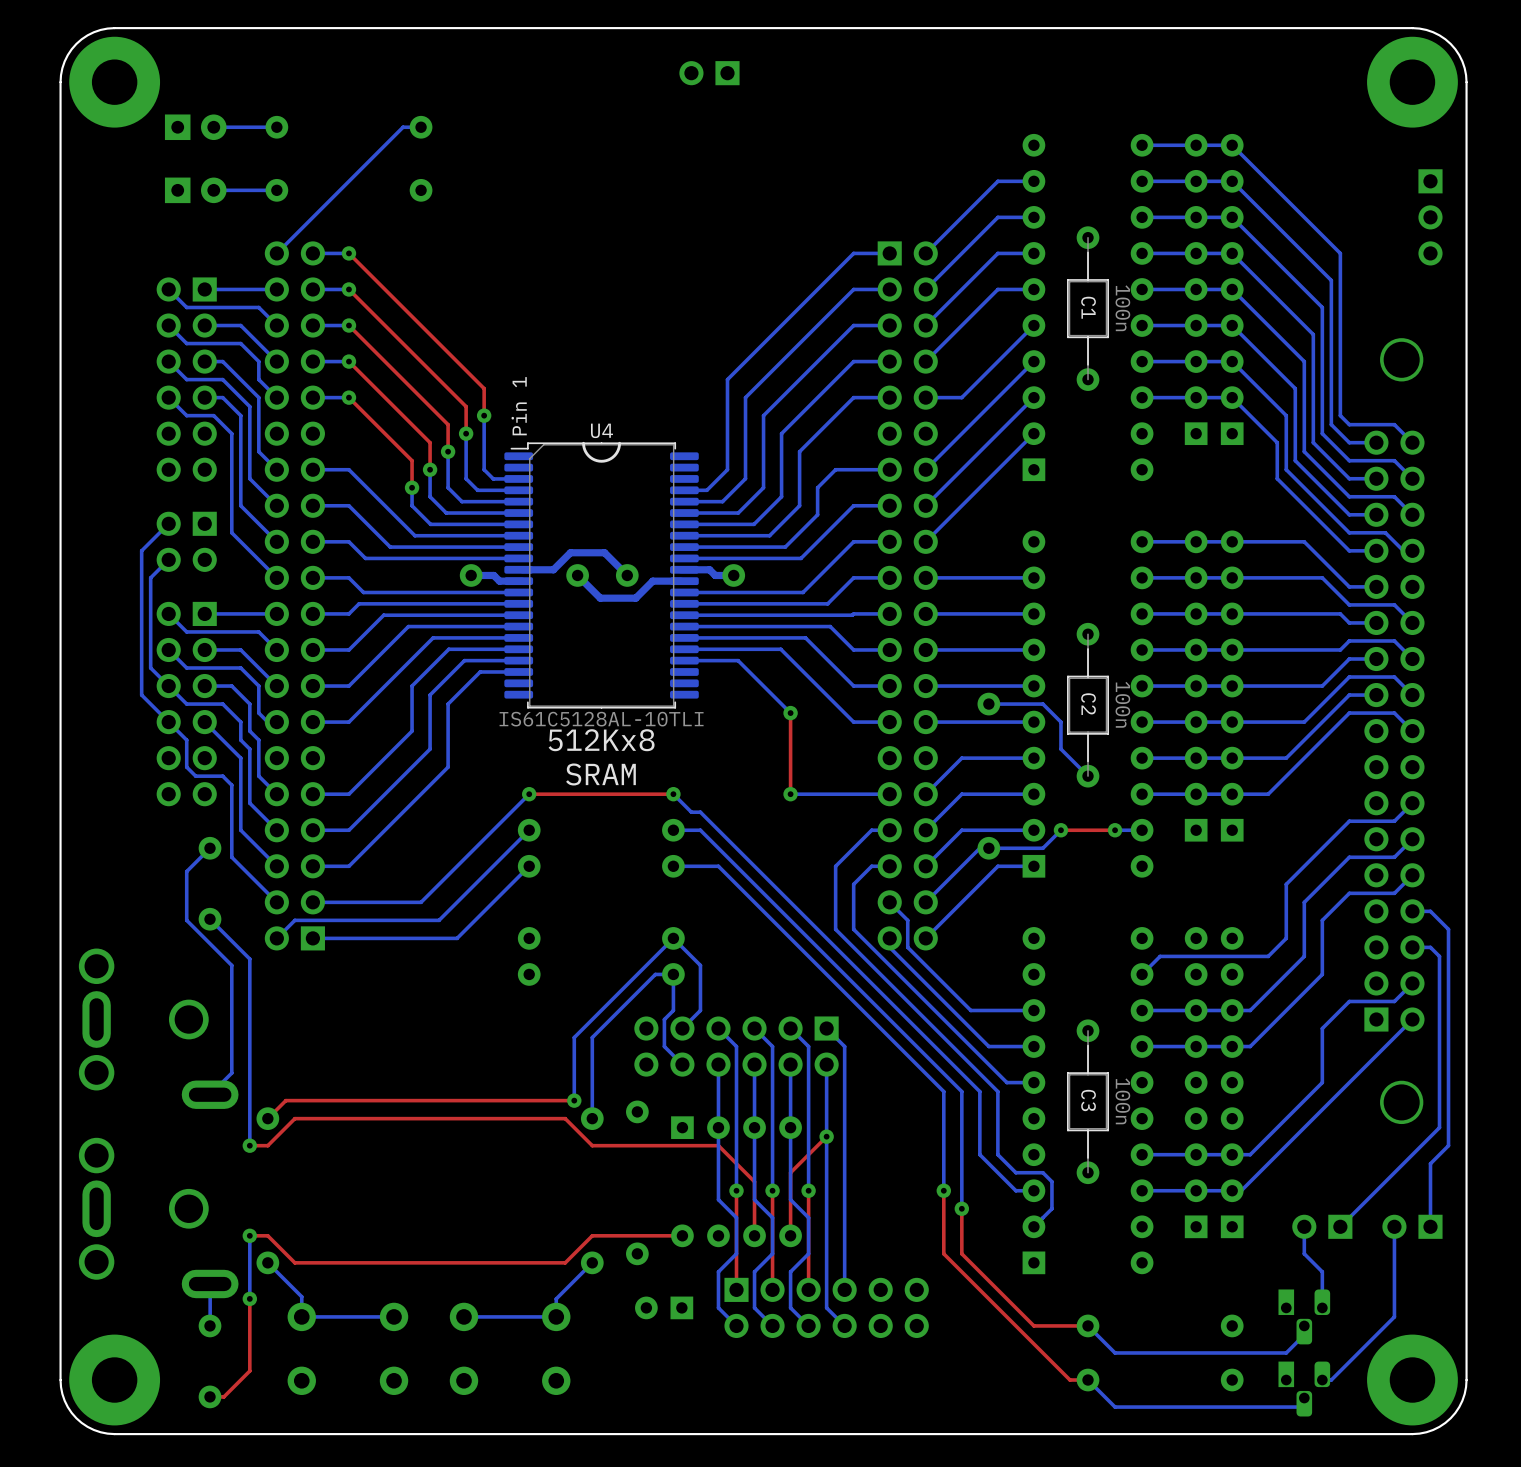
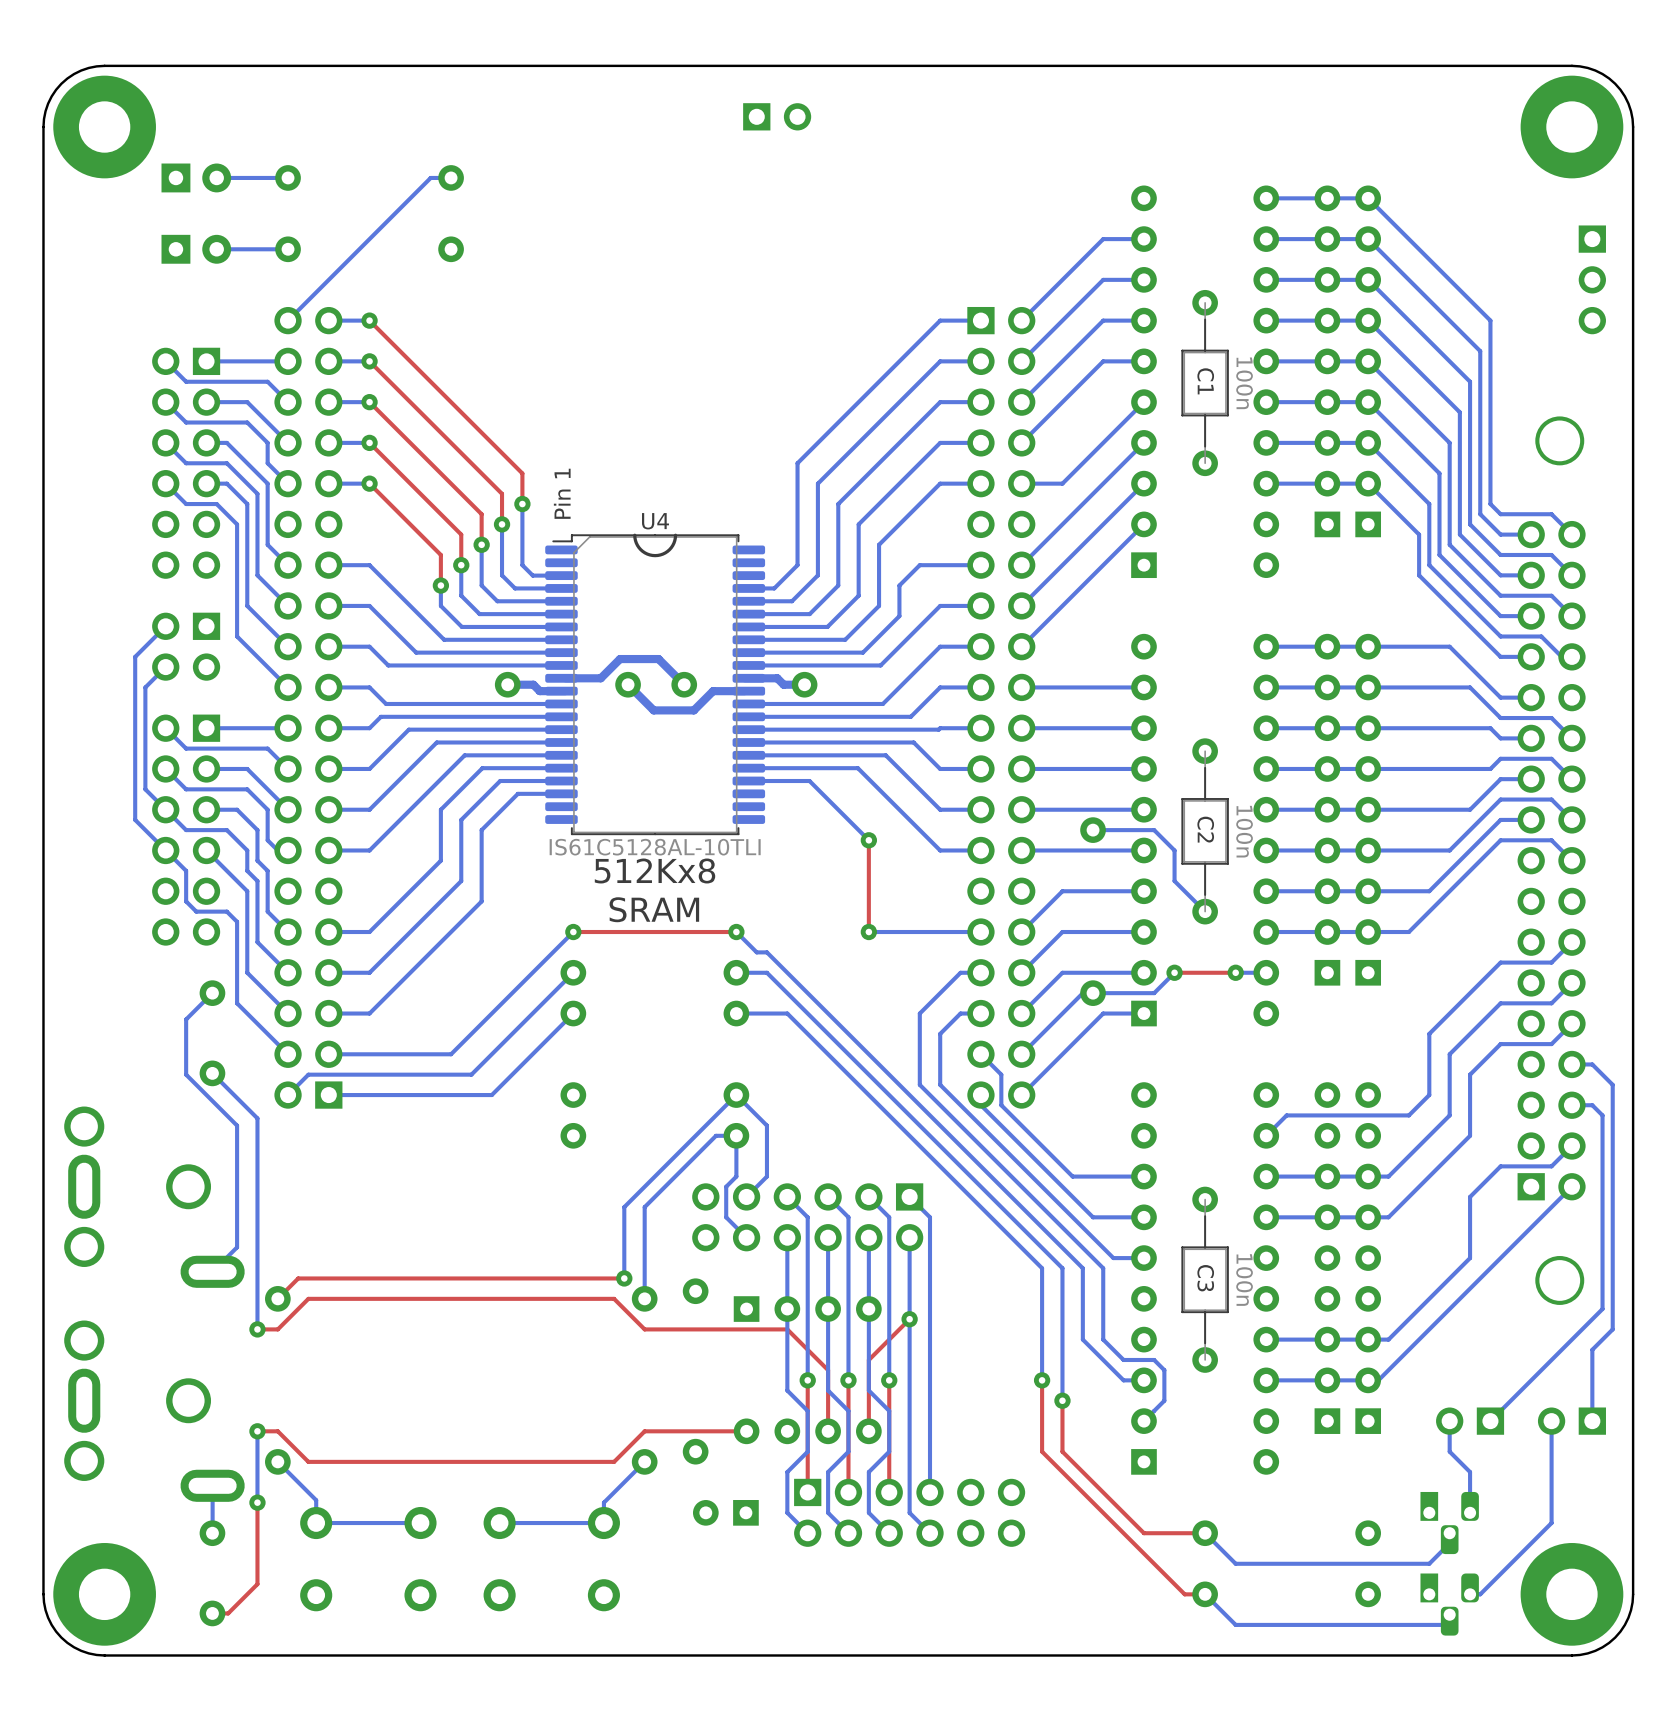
part rotation: 0° (709, 73) -> 180° (777, 116)

